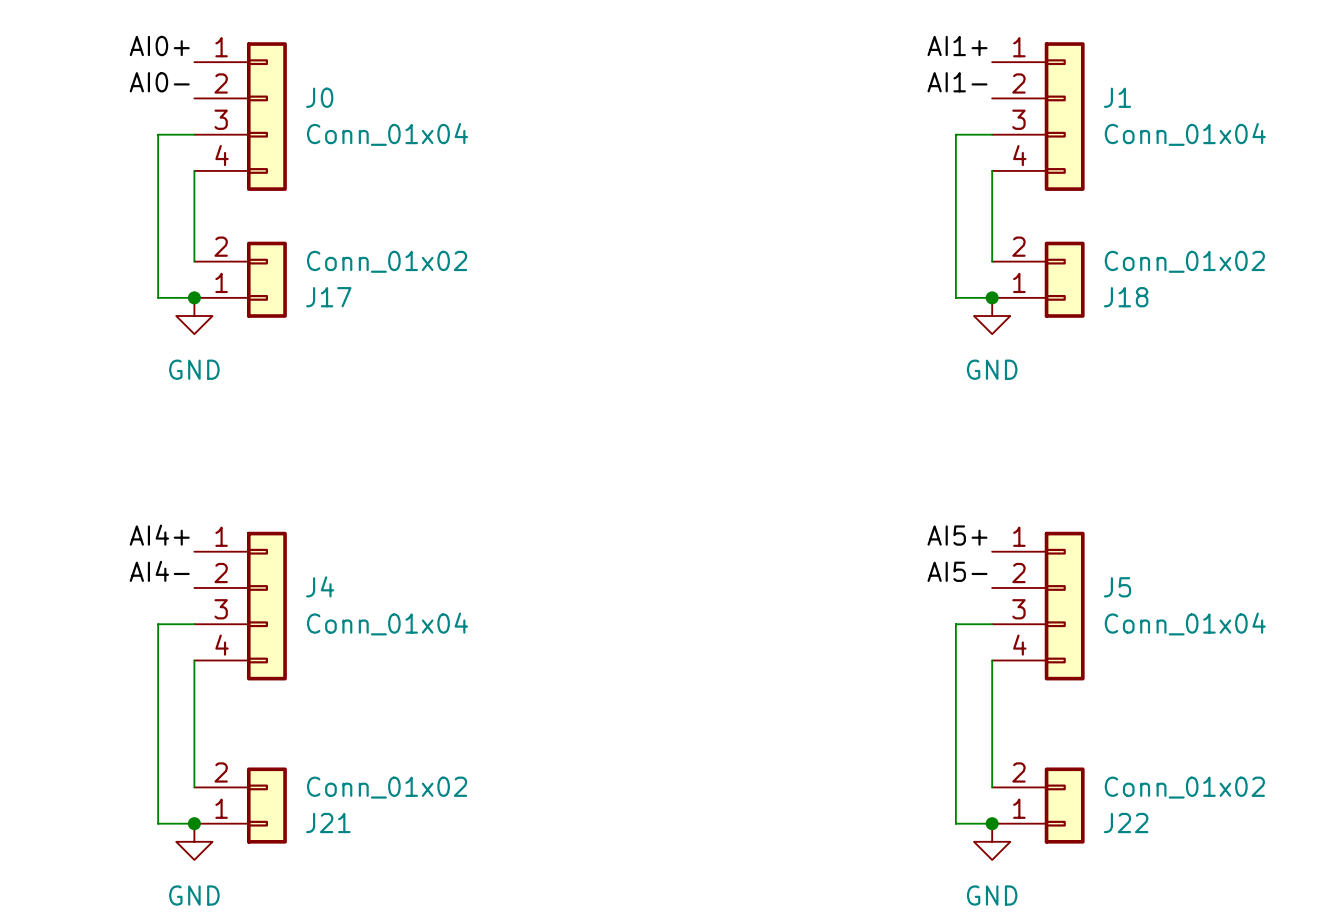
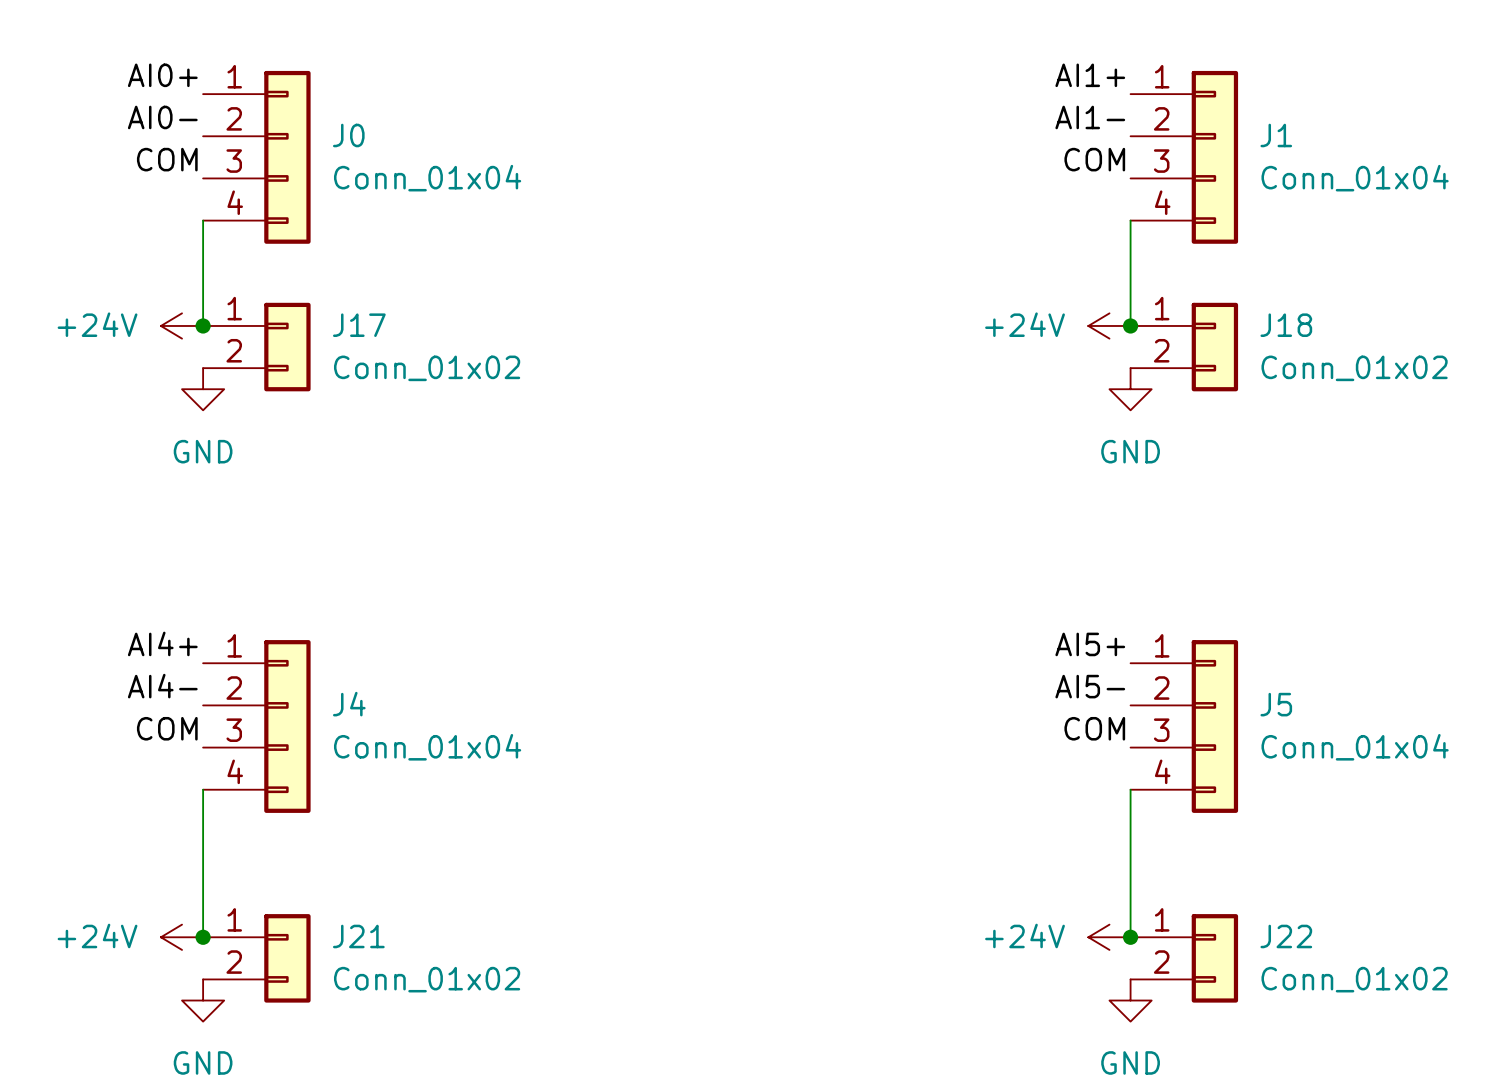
label: none -> COM (167, 159)
label: none -> COM (1094, 159)
wire: (194, 134) (158, 134) (158, 297) (194, 297) -> none
wire: (992, 134) (955, 134) (955, 297) (992, 297) -> none
power symbol: none -> +24V (182, 325)
power symbol: none -> +24V (1109, 325)
J17 flip: as is (266, 279) -> up-down (287, 347)
J18 flip: as is (1064, 279) -> up-down (1214, 347)
junction position: (194, 297) -> (203, 325)
junction position: (992, 297) -> (1130, 325)
label: none -> COM (167, 728)
label: none -> COM (1094, 728)
wire: (194, 624) (158, 624) (158, 823) (194, 823) -> none
wire: (992, 624) (955, 624) (955, 823) (992, 823) -> none
power symbol: none -> +24V (182, 937)
power symbol: none -> +24V (1109, 937)
J21 flip: as is (266, 805) -> up-down (287, 958)
J22 flip: as is (1064, 805) -> up-down (1214, 958)
junction position: (194, 823) -> (203, 937)
junction position: (992, 823) -> (1130, 937)

